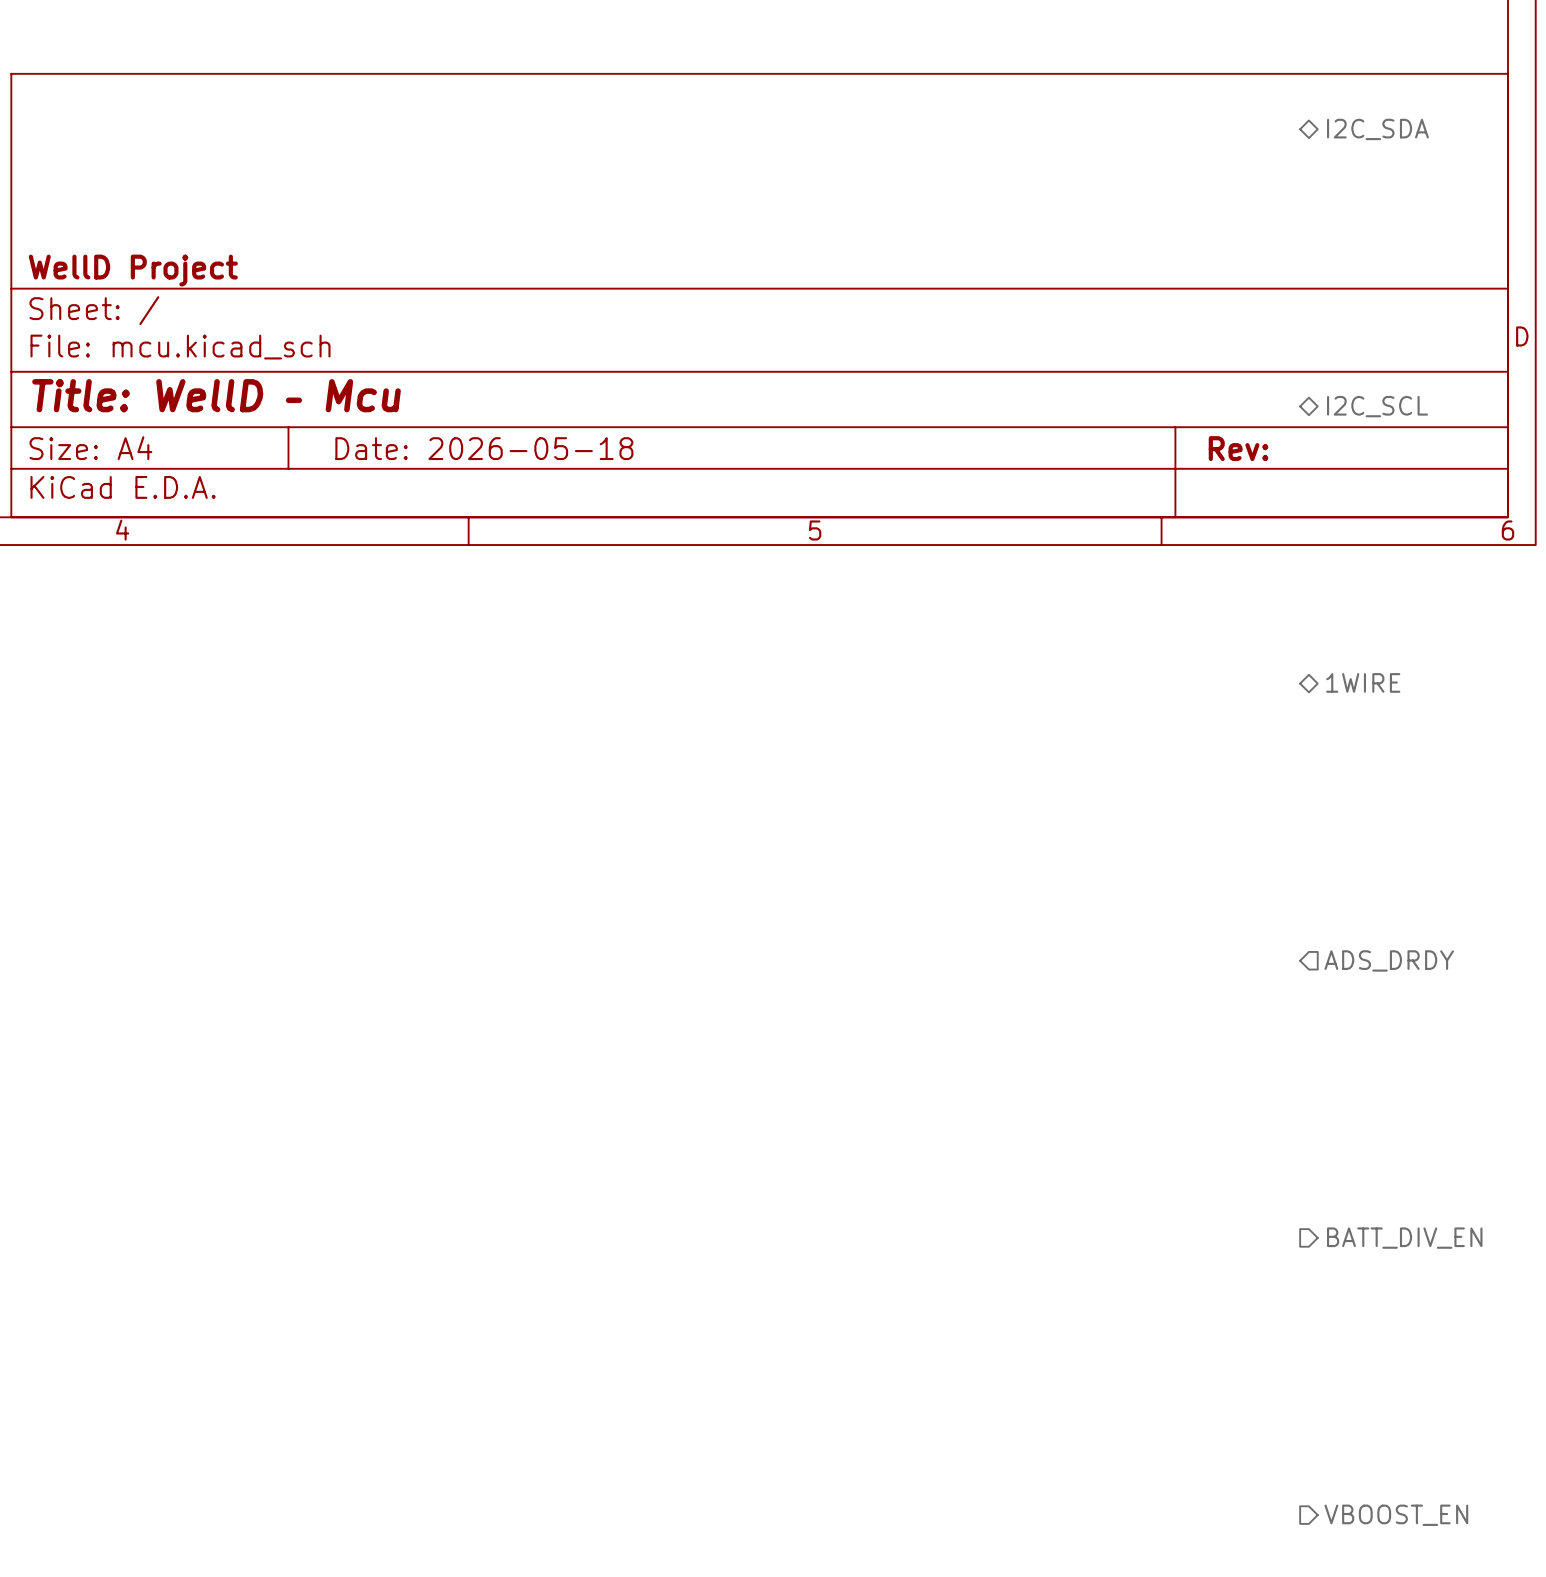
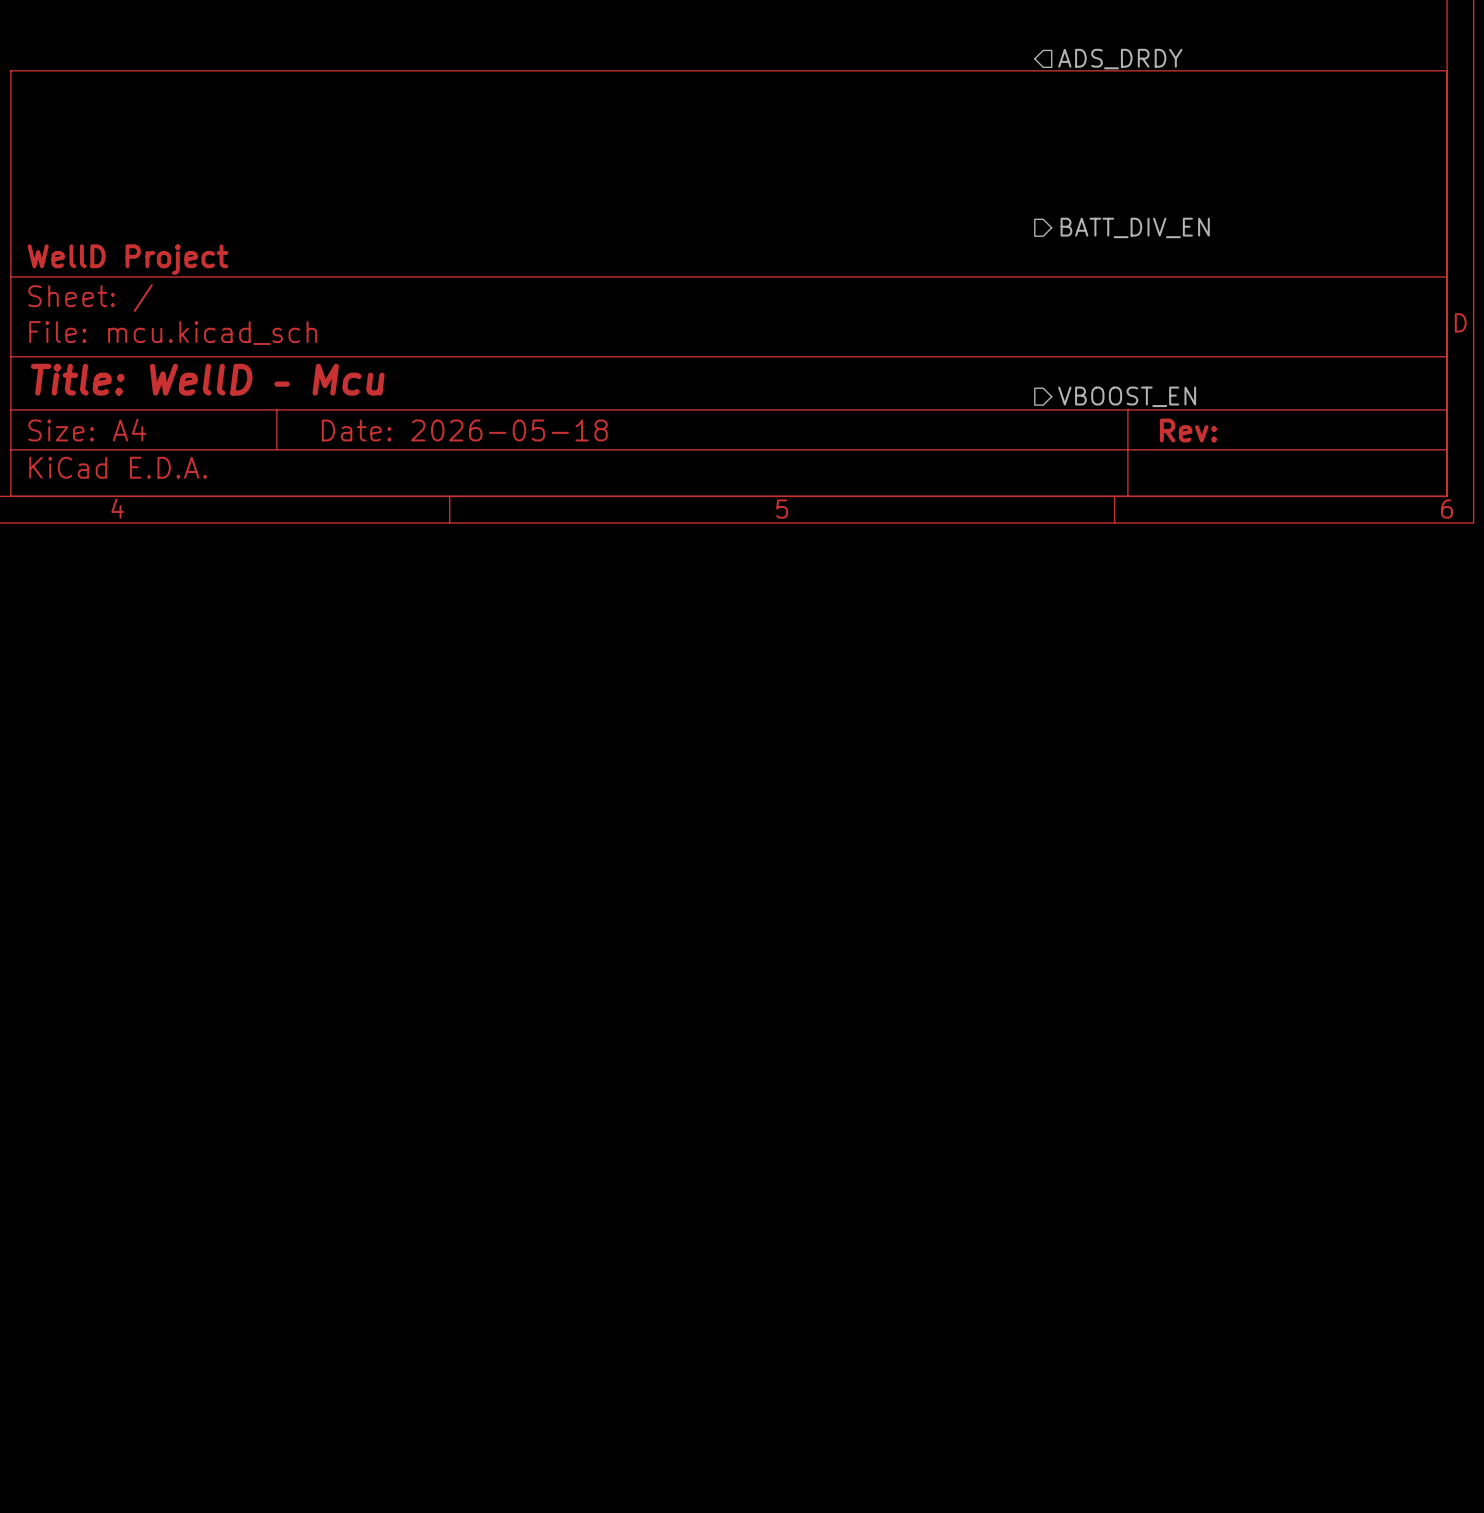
hierarchical label: none -> ADS_DRDY (1120, 59)
hierarchical label: I2C_SDA (1377, 129) -> none
hierarchical label: none -> BATT_DIV_EN (1135, 227)
hierarchical label: I2C_SCL (1377, 406) -> none
hierarchical label: none -> VBOOST_EN (1127, 396)
hierarchical label: 1WIRE (1363, 682) -> none
hierarchical label: ADS_DRDY (1389, 960) -> none
hierarchical label: BATT_DIV_EN (1404, 1238) -> none
hierarchical label: VBOOST_EN (1396, 1515) -> none

